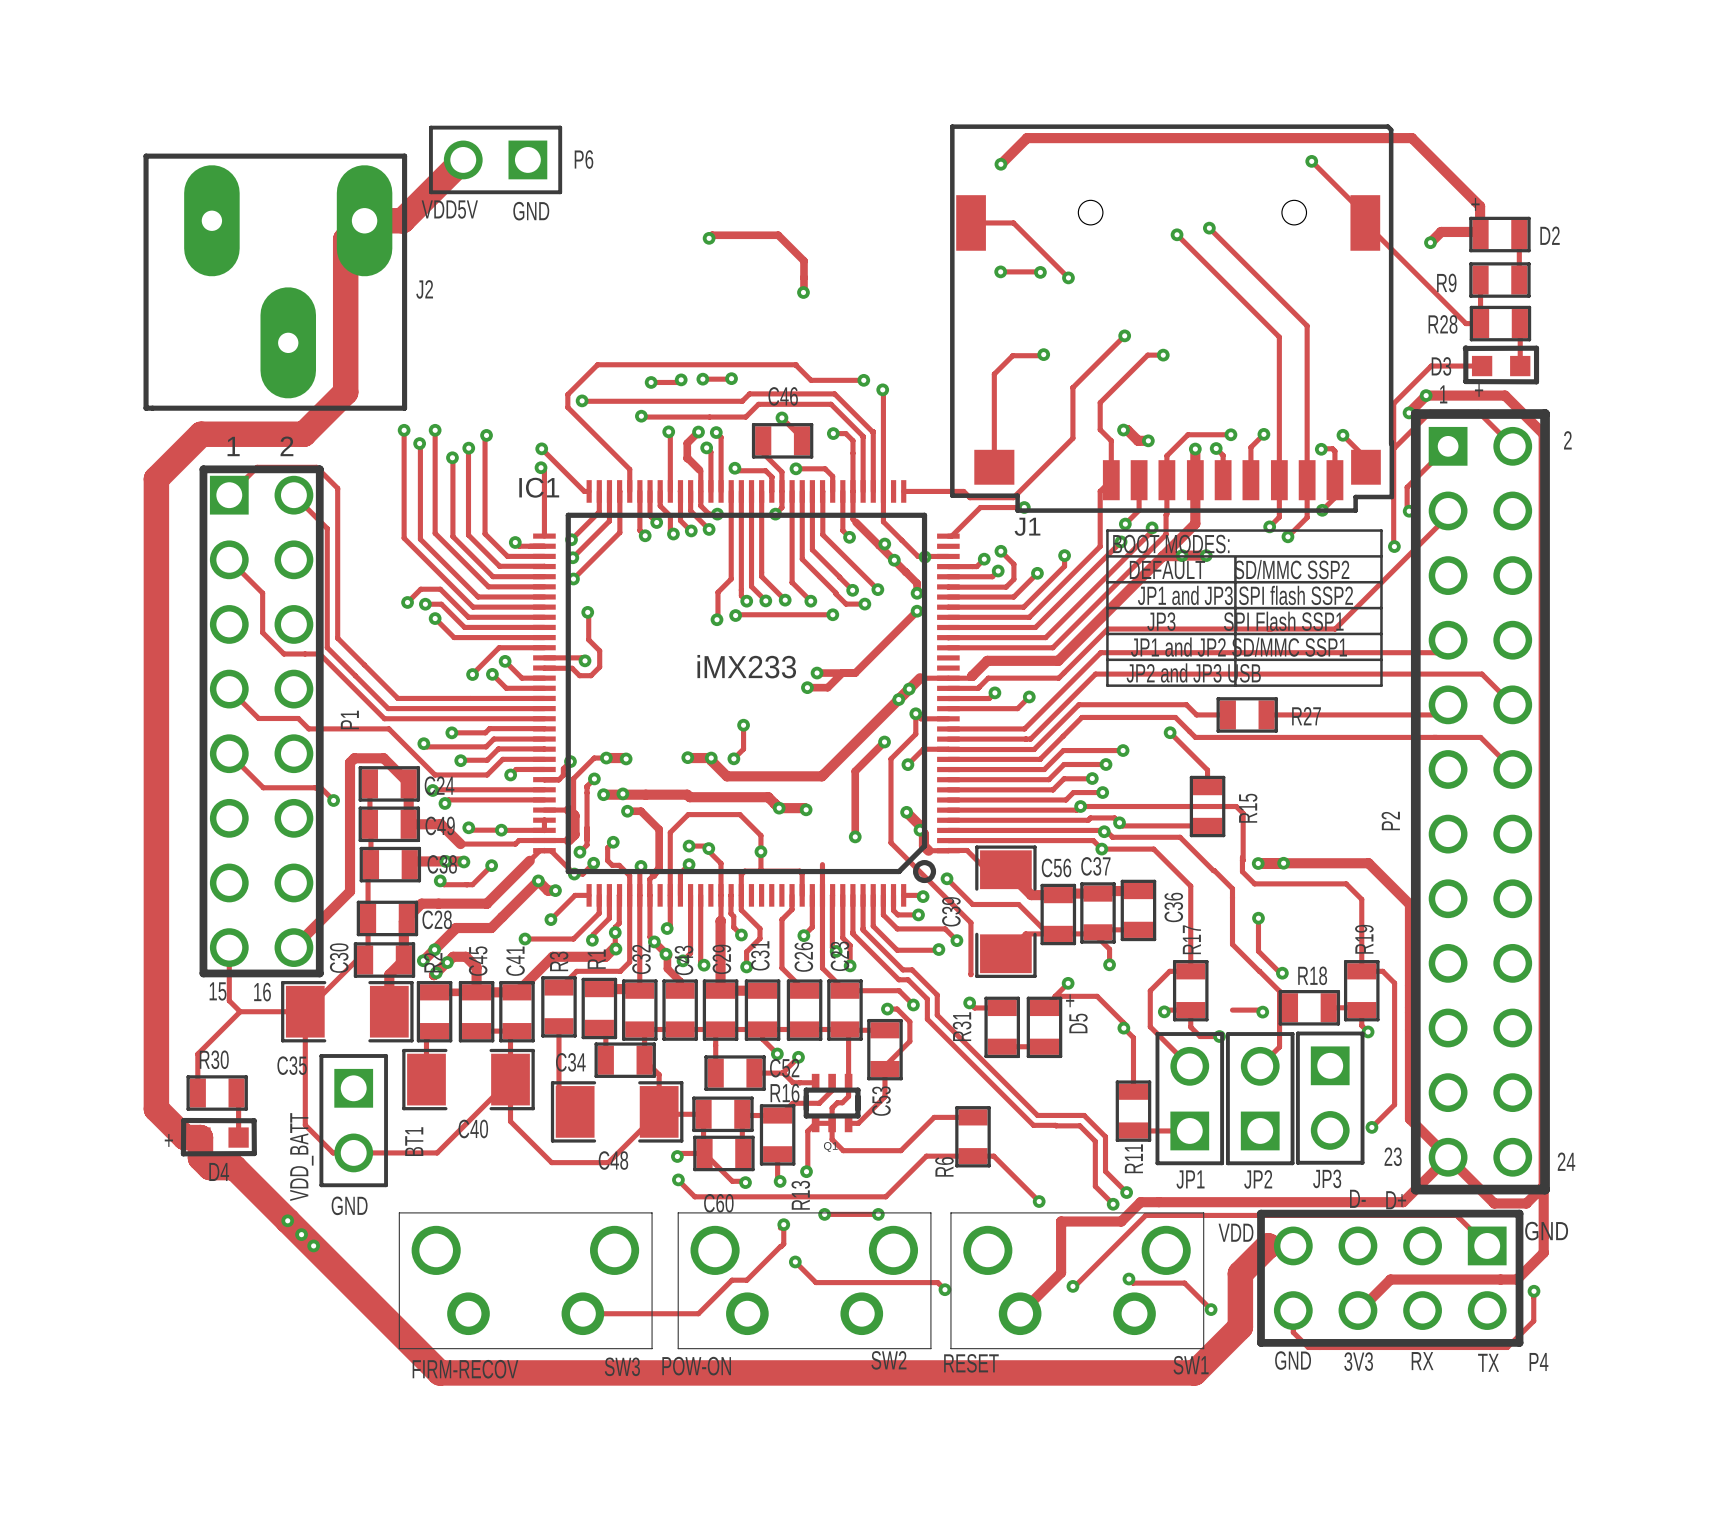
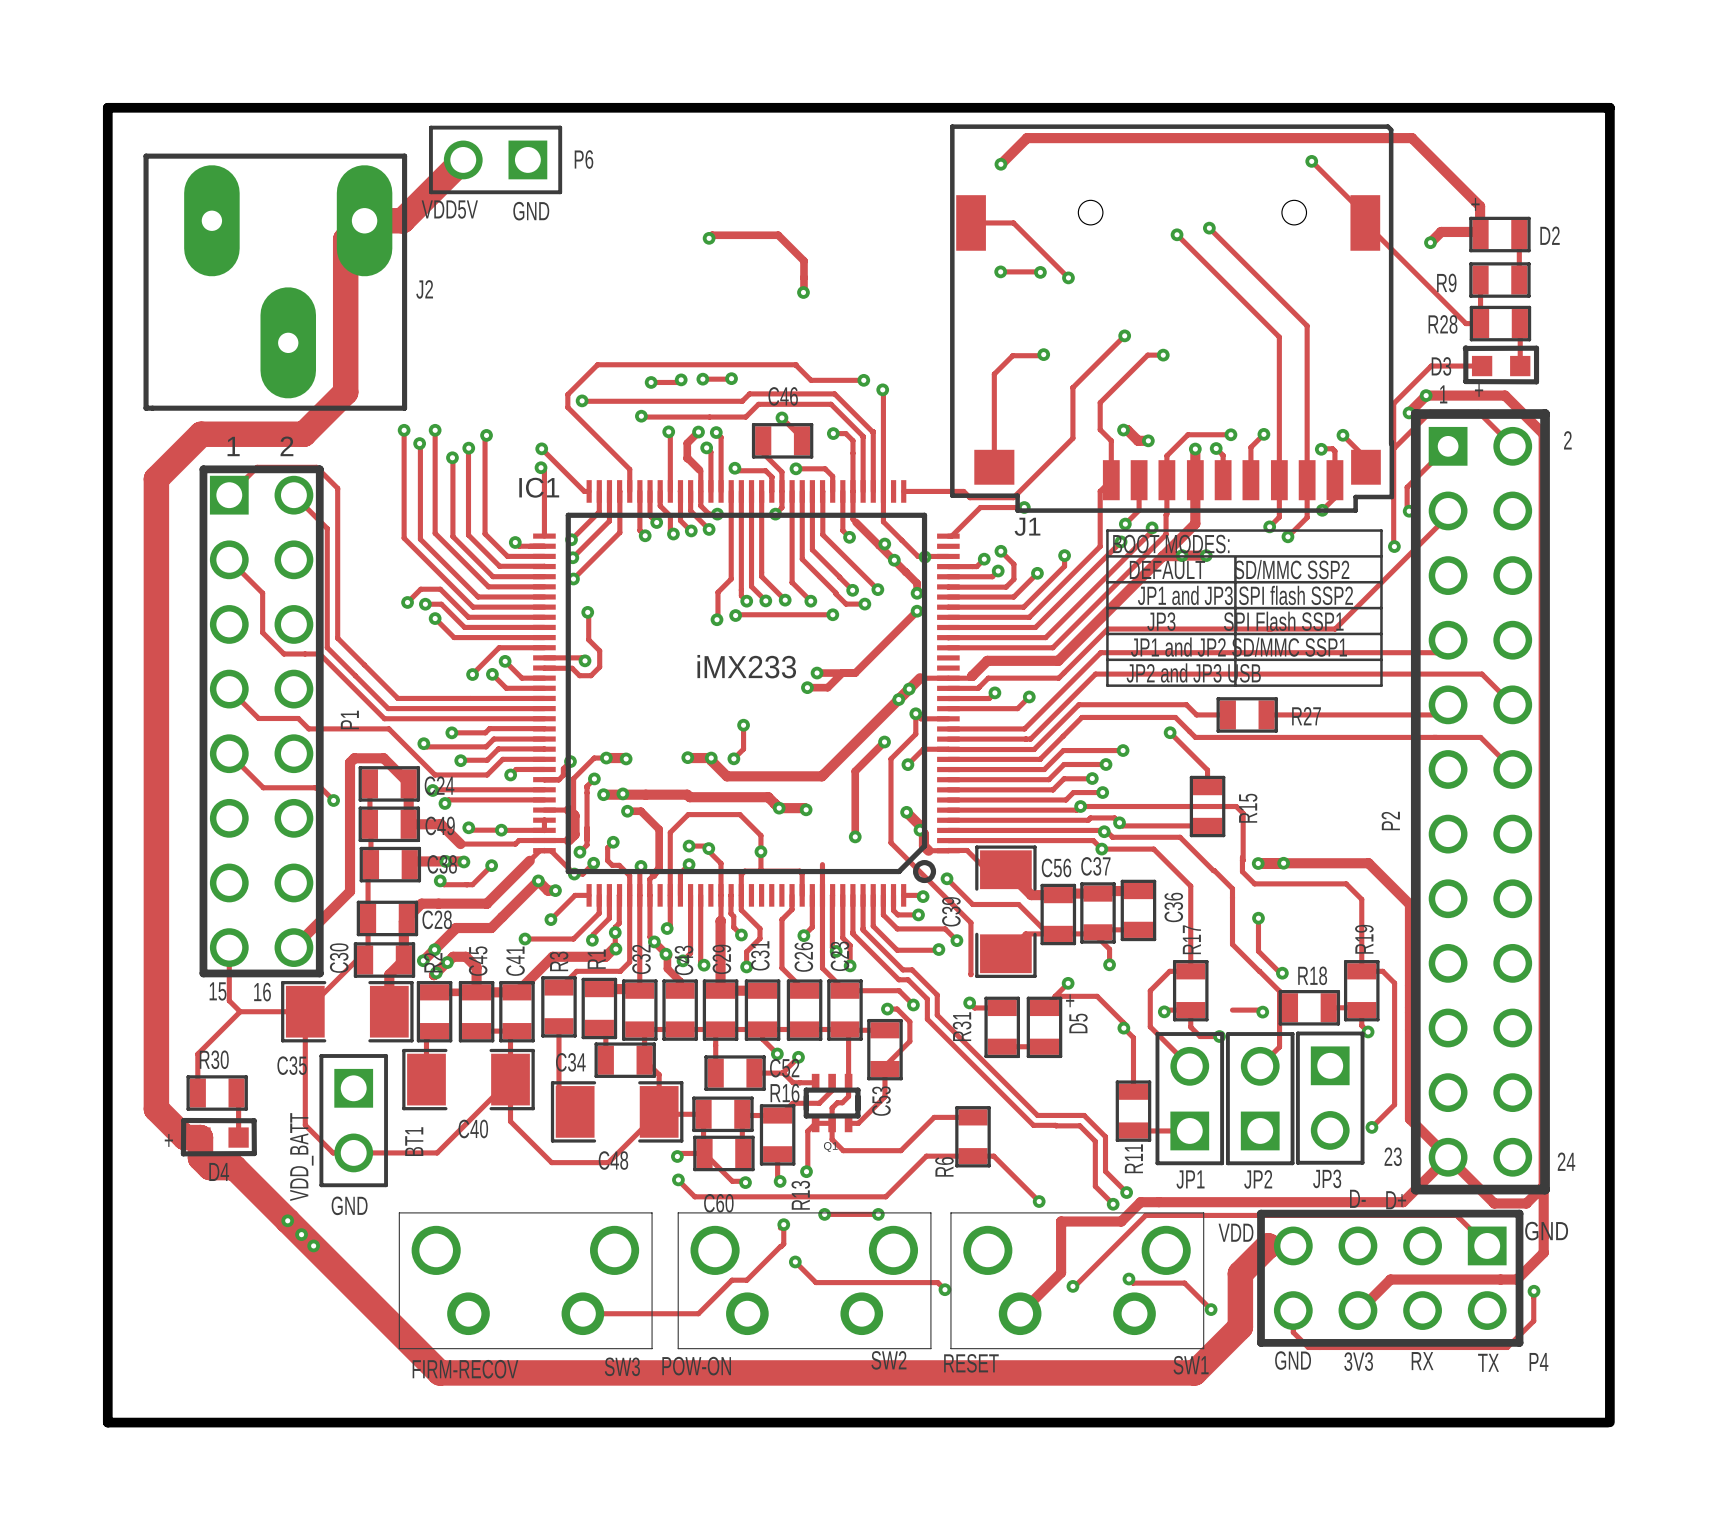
board edge: none -> (1609, 1422) (1609, 107) (107, 107) (107, 1422) (1608, 1422)

